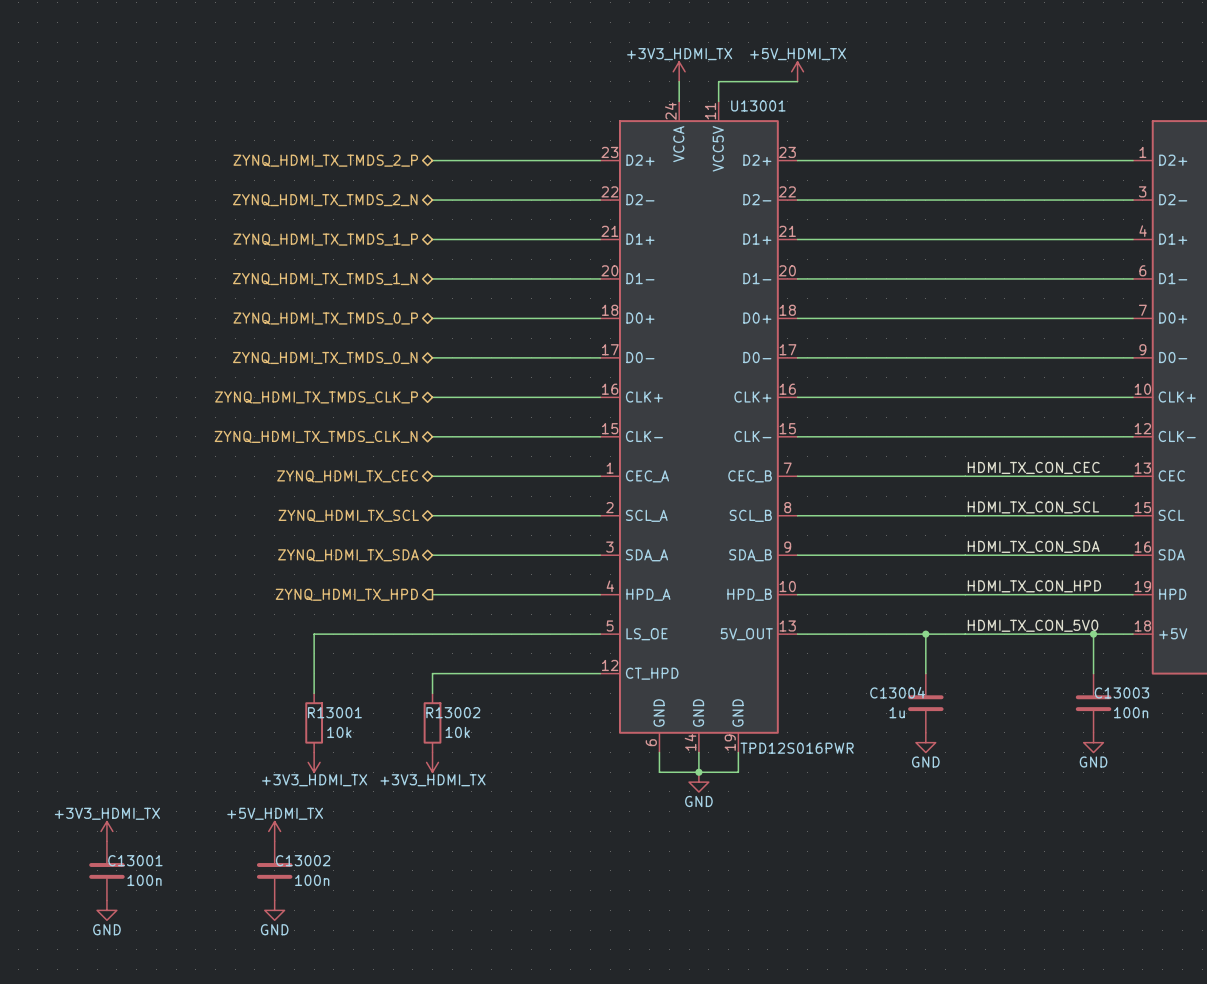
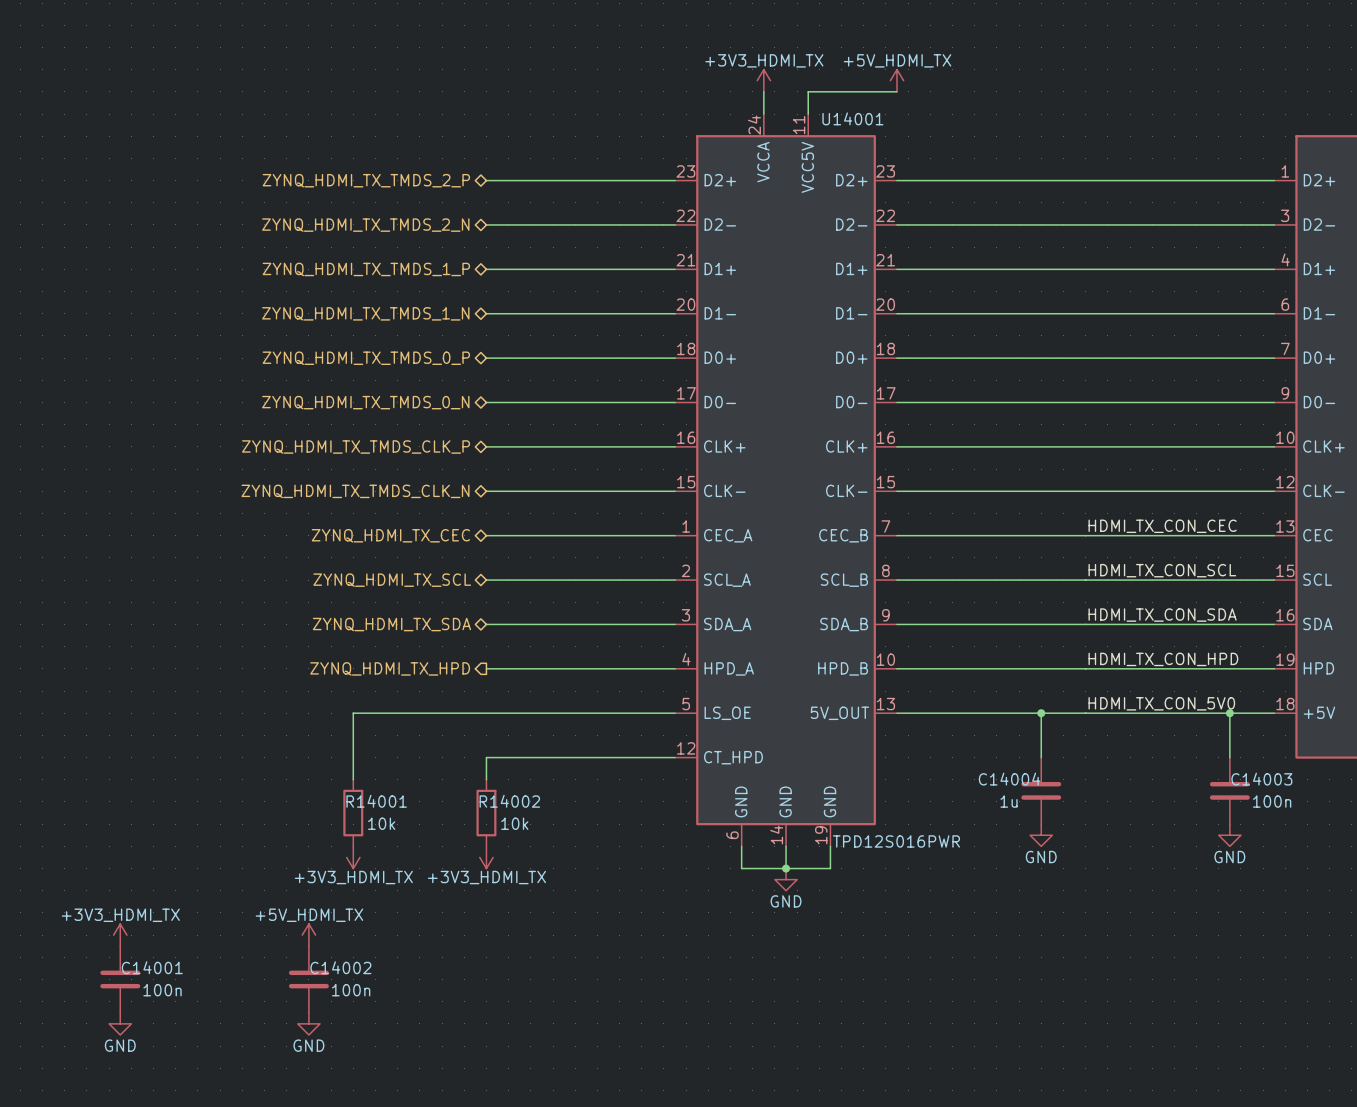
U13001 name: U13001 (758, 105) -> U14001 (852, 118)
C13004 name: C13004 (897, 692) -> C14004 (1009, 779)
C13003 name: C13003 (1121, 692) -> C14003 (1261, 779)
R13001 name: R13001 (334, 712) -> R14001 (376, 801)
R13002 name: R13002 (453, 712) -> R14002 (509, 801)
C13001 name: C13001 (135, 860) -> C14001 (152, 967)
C13002 name: C13002 (303, 860) -> C14002 (340, 967)

